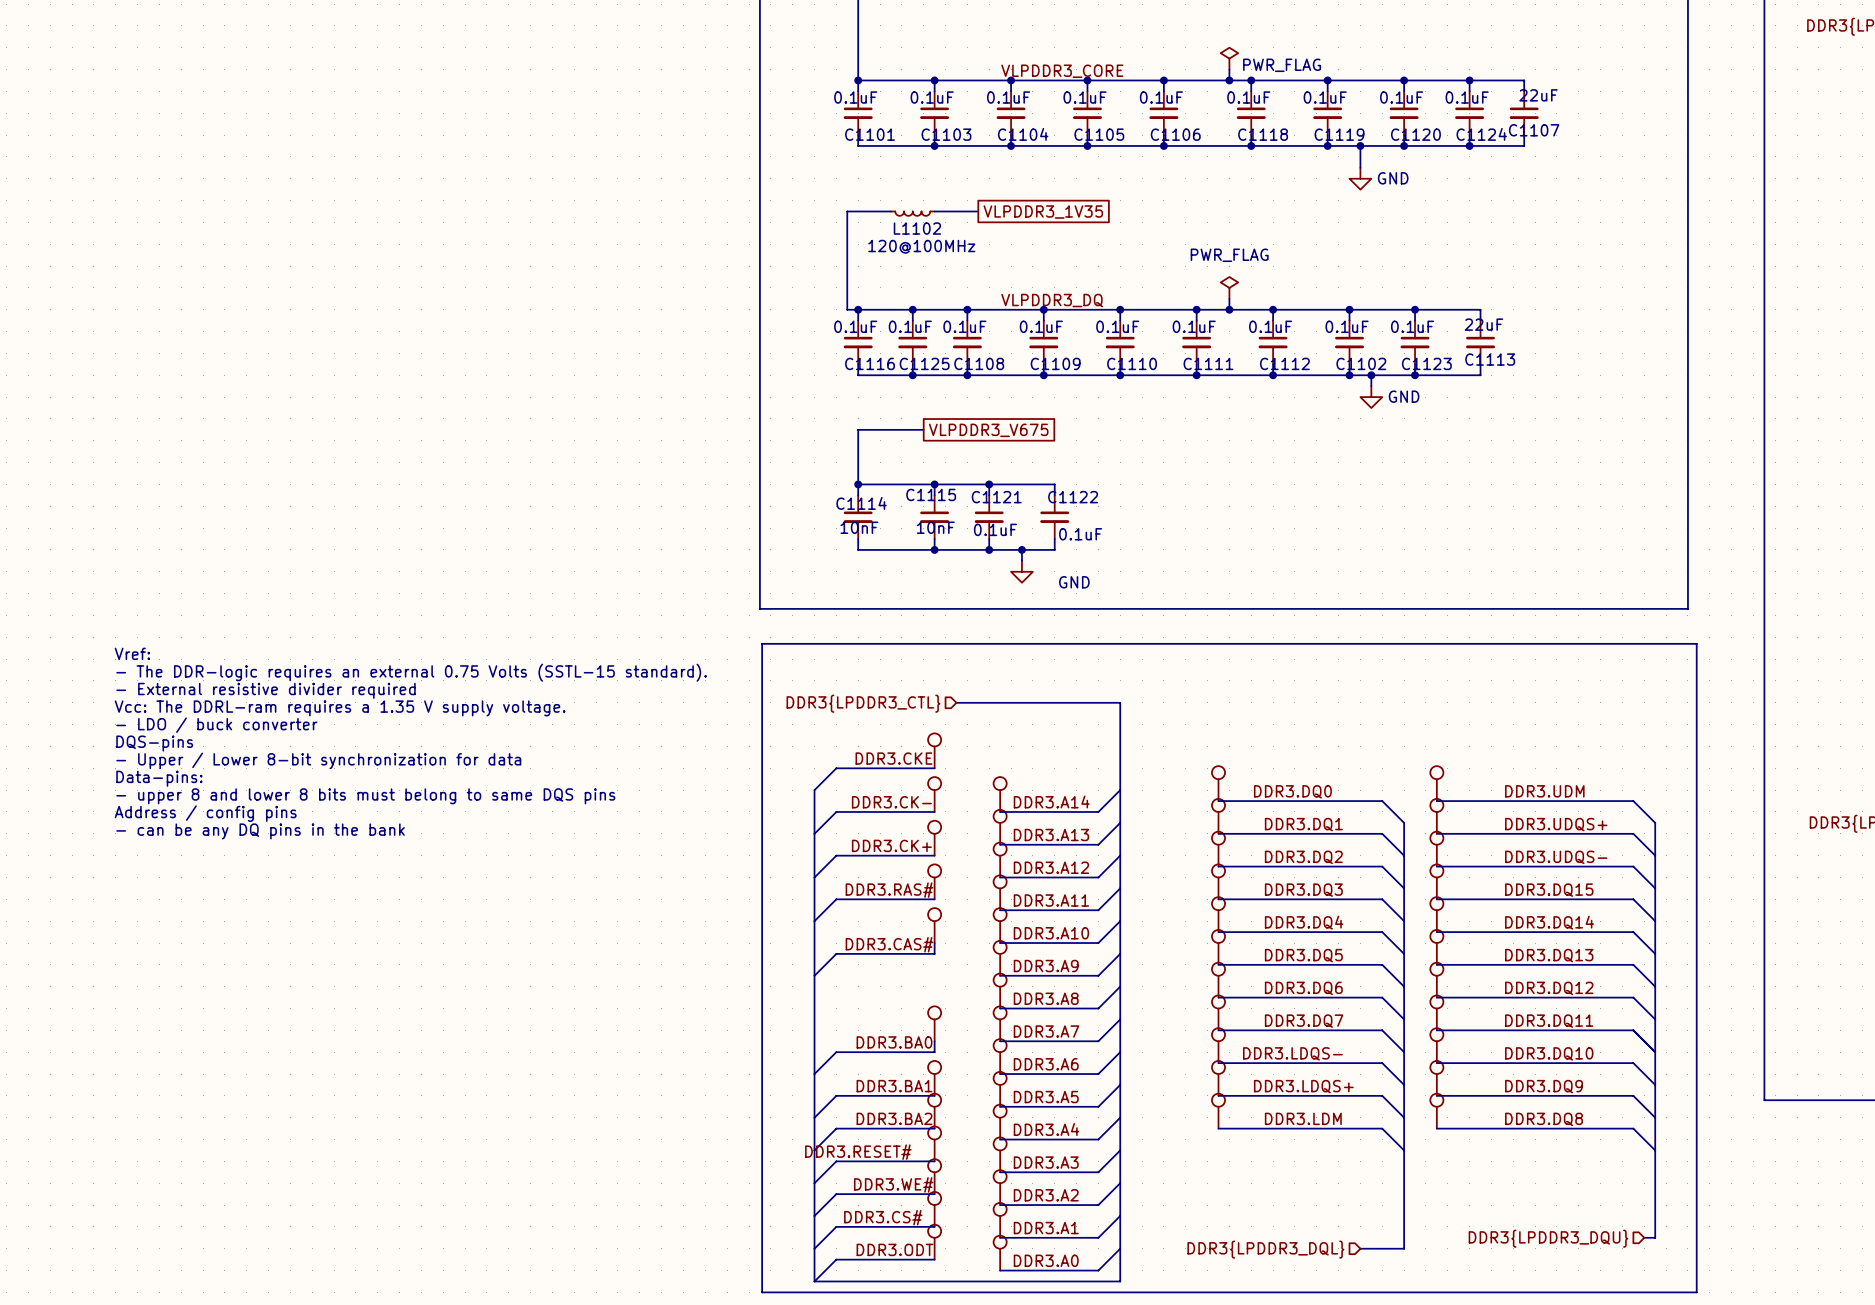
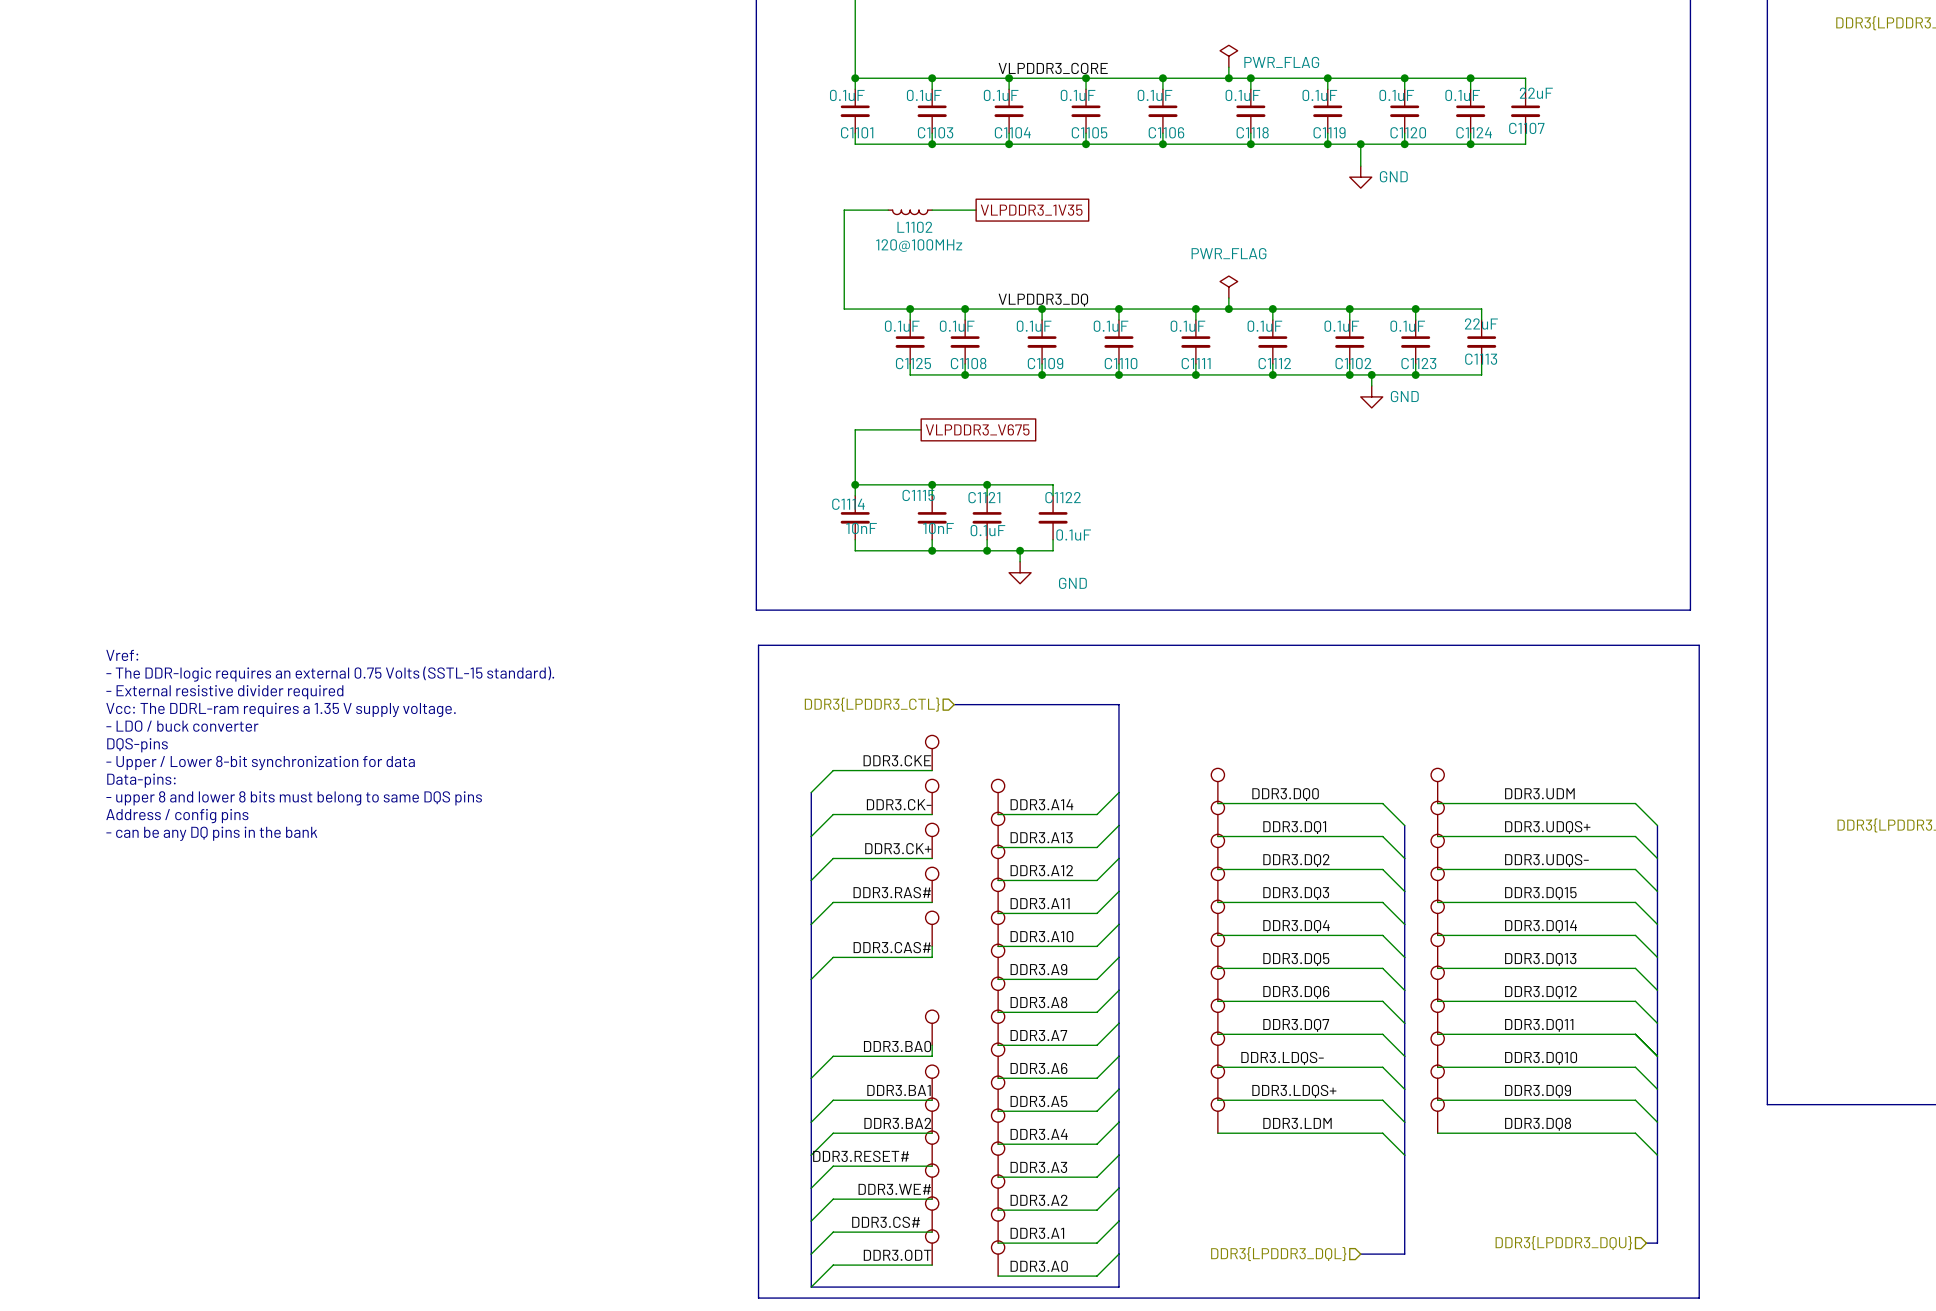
wire: (858, 309) (858, 320) -> none
junction: (858, 309) -> none
C1116: 0.1uF (858, 342) -> none
wire: (858, 364) (858, 375) (912, 375) -> none
junction: (912, 375) -> none

